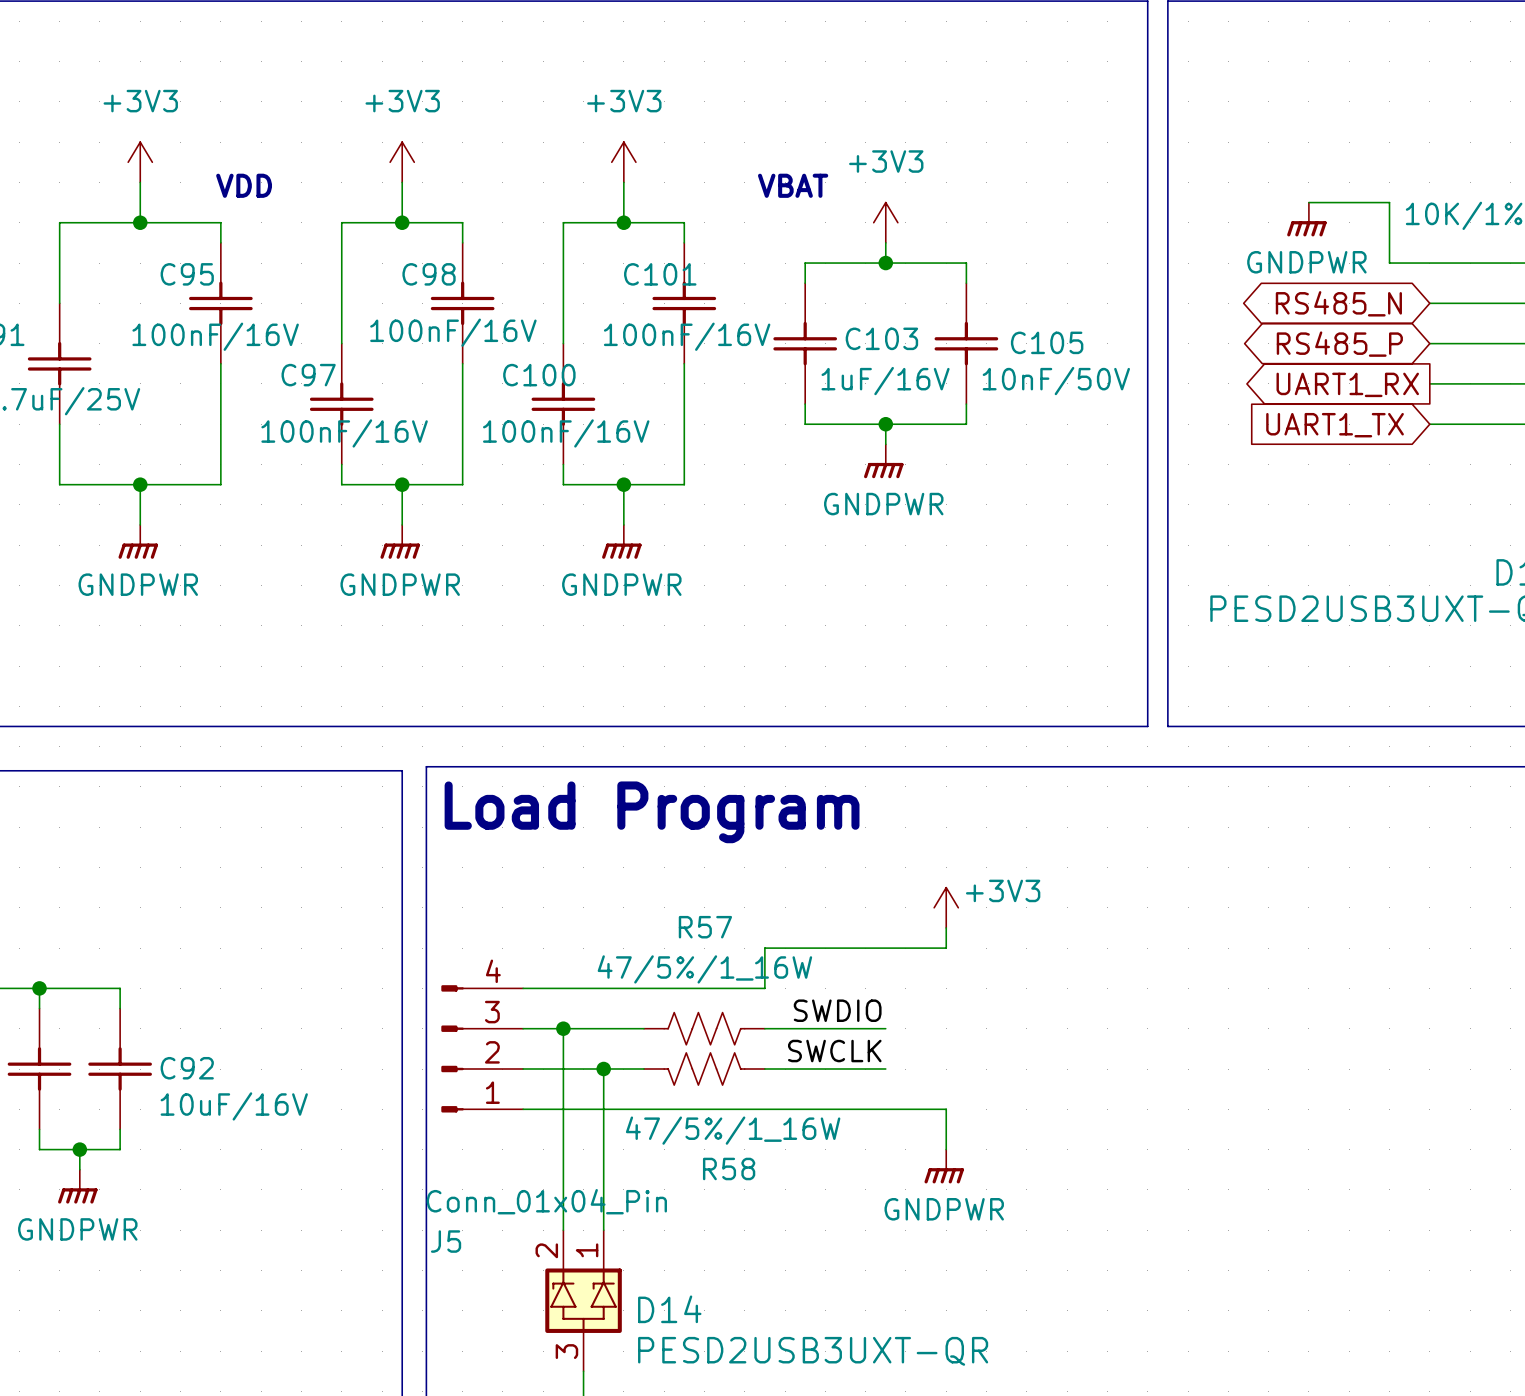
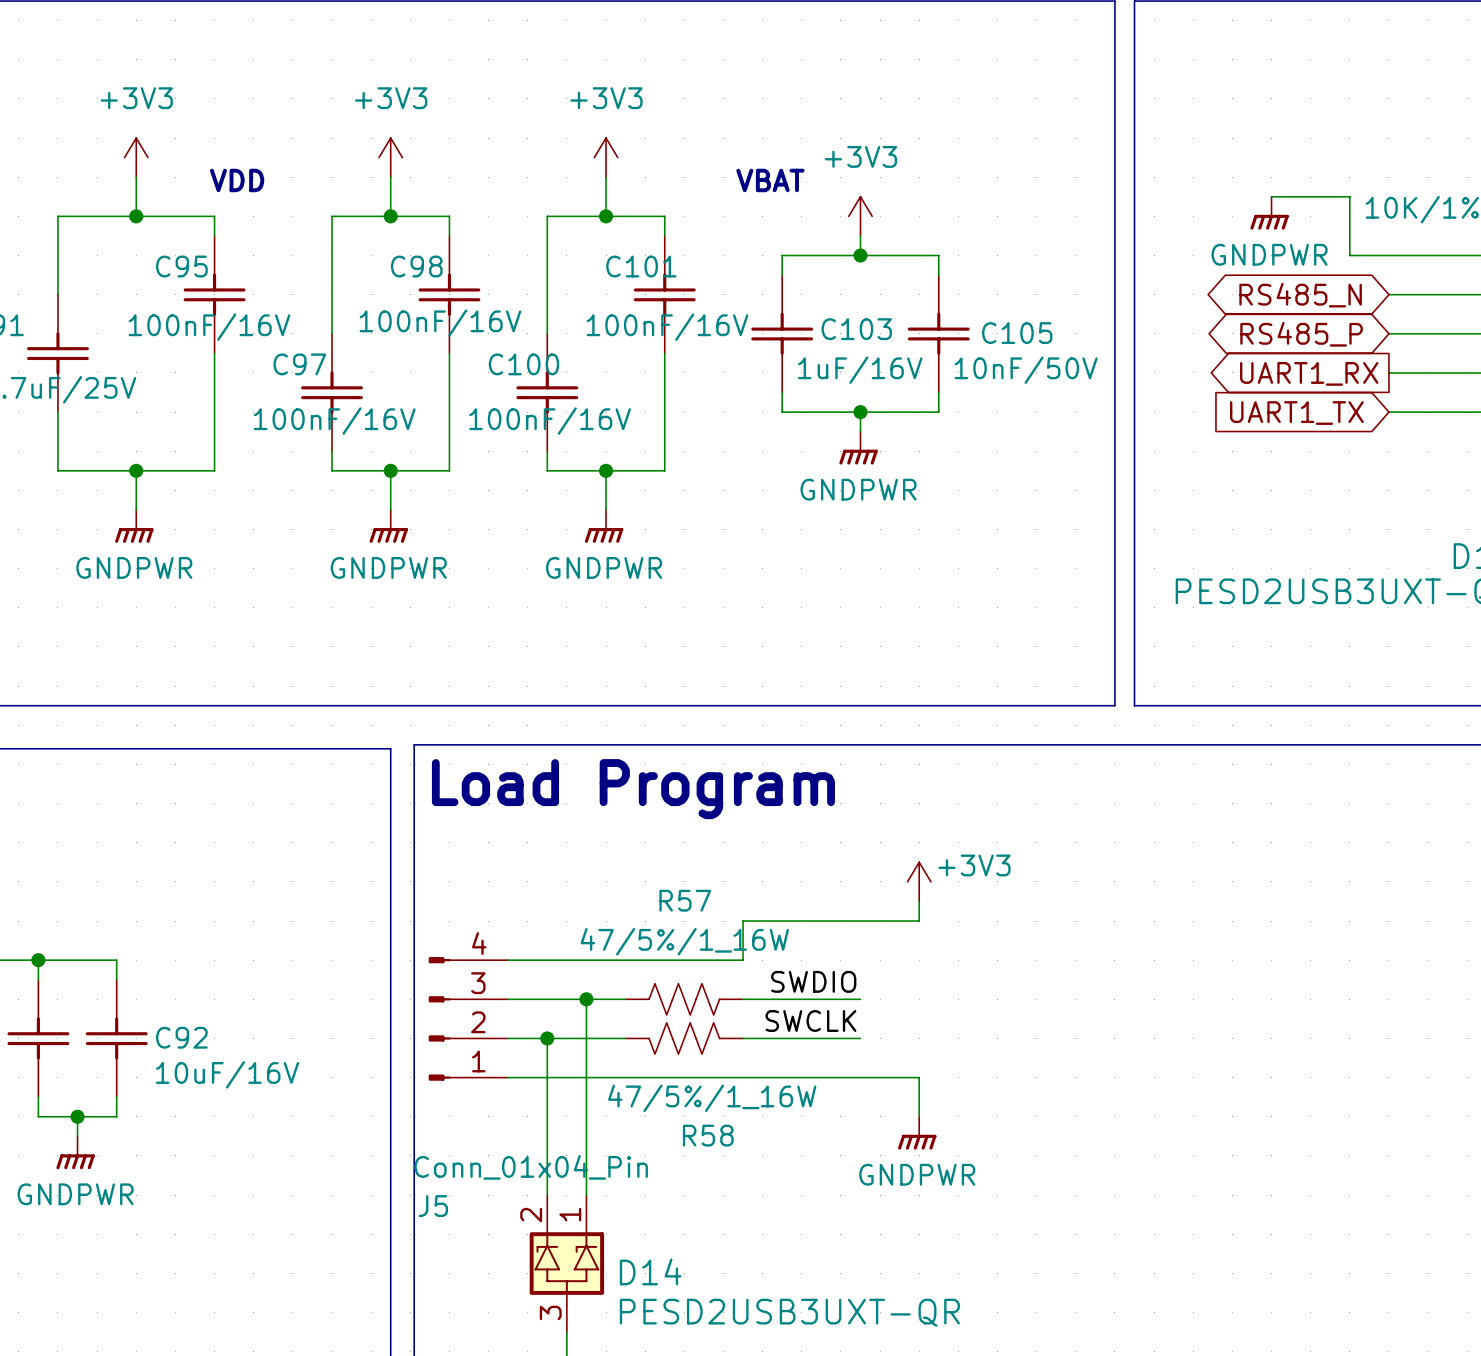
wire: (563, 1028) (563, 1069) -> (586, 999) (586, 1038)
junction: (563, 1028) -> none
junction: none -> (586, 999)
junction: none -> (547, 1038)
junction: (603, 1069) -> none

